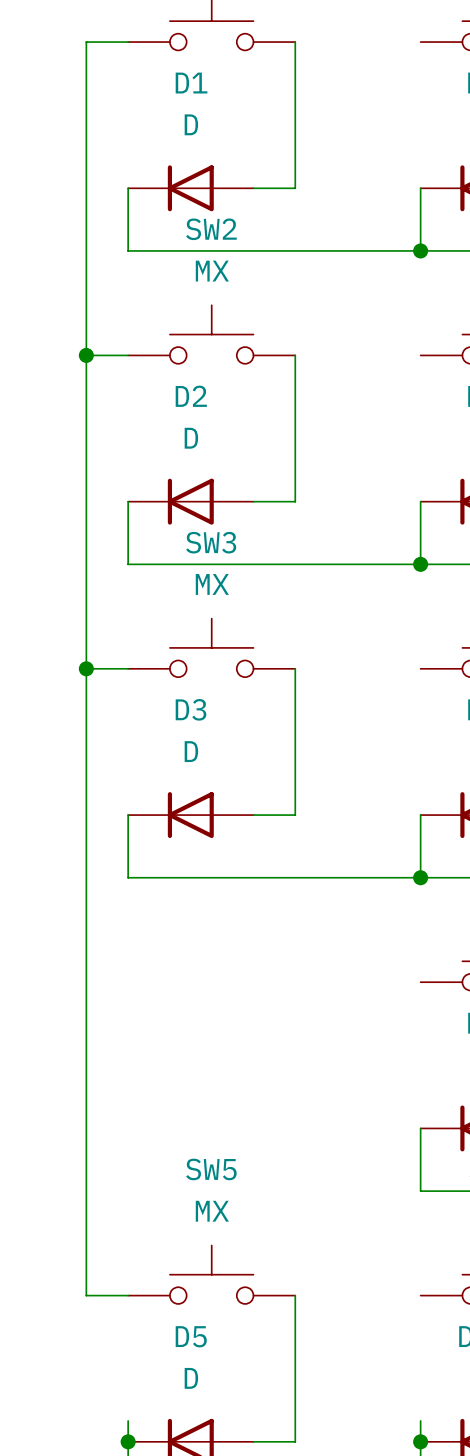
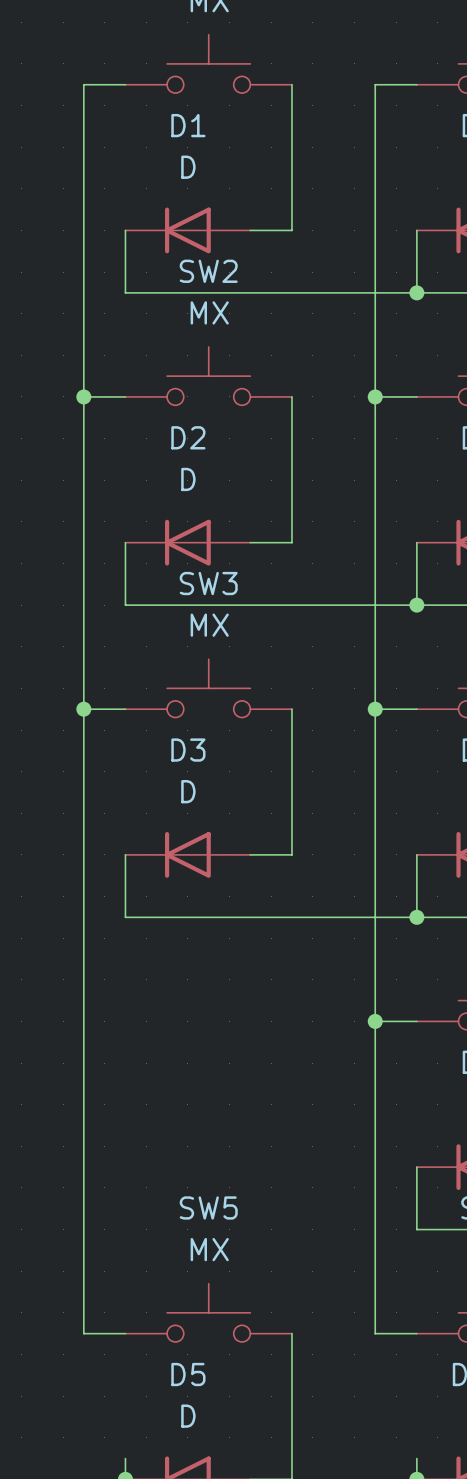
wire: none -> (416, 84) (375, 84) (375, 1333) (416, 1333)
wire: none -> (375, 396) (416, 396)
junction: none -> (375, 396)
wire: none -> (375, 709) (416, 709)
junction: none -> (375, 709)
wire: none -> (375, 1021) (416, 1021)
junction: none -> (375, 1021)

